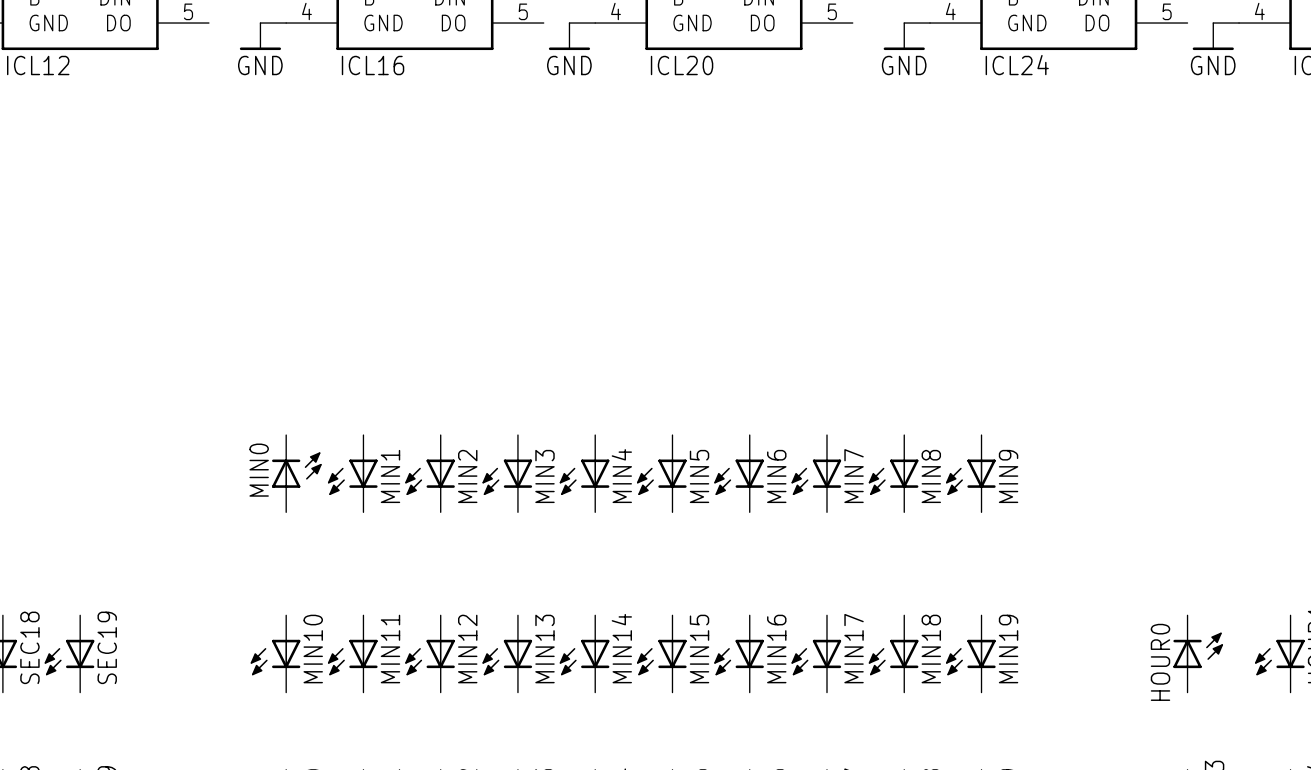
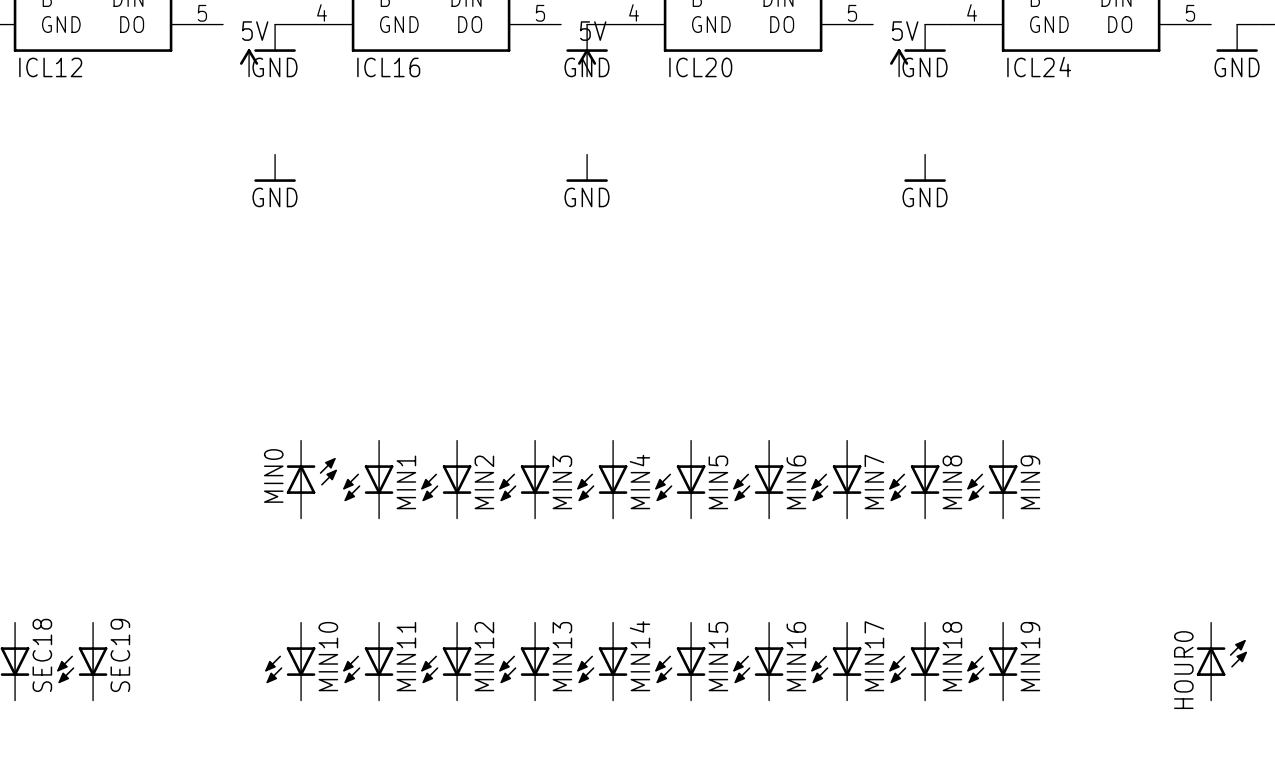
power symbol: none -> 5V (249, 62)
power symbol: none -> 5V (587, 62)
power symbol: none -> 5V (899, 62)
power symbol: none -> GND (275, 168)
power symbol: none -> GND (587, 168)
power symbol: none -> GND (925, 168)

